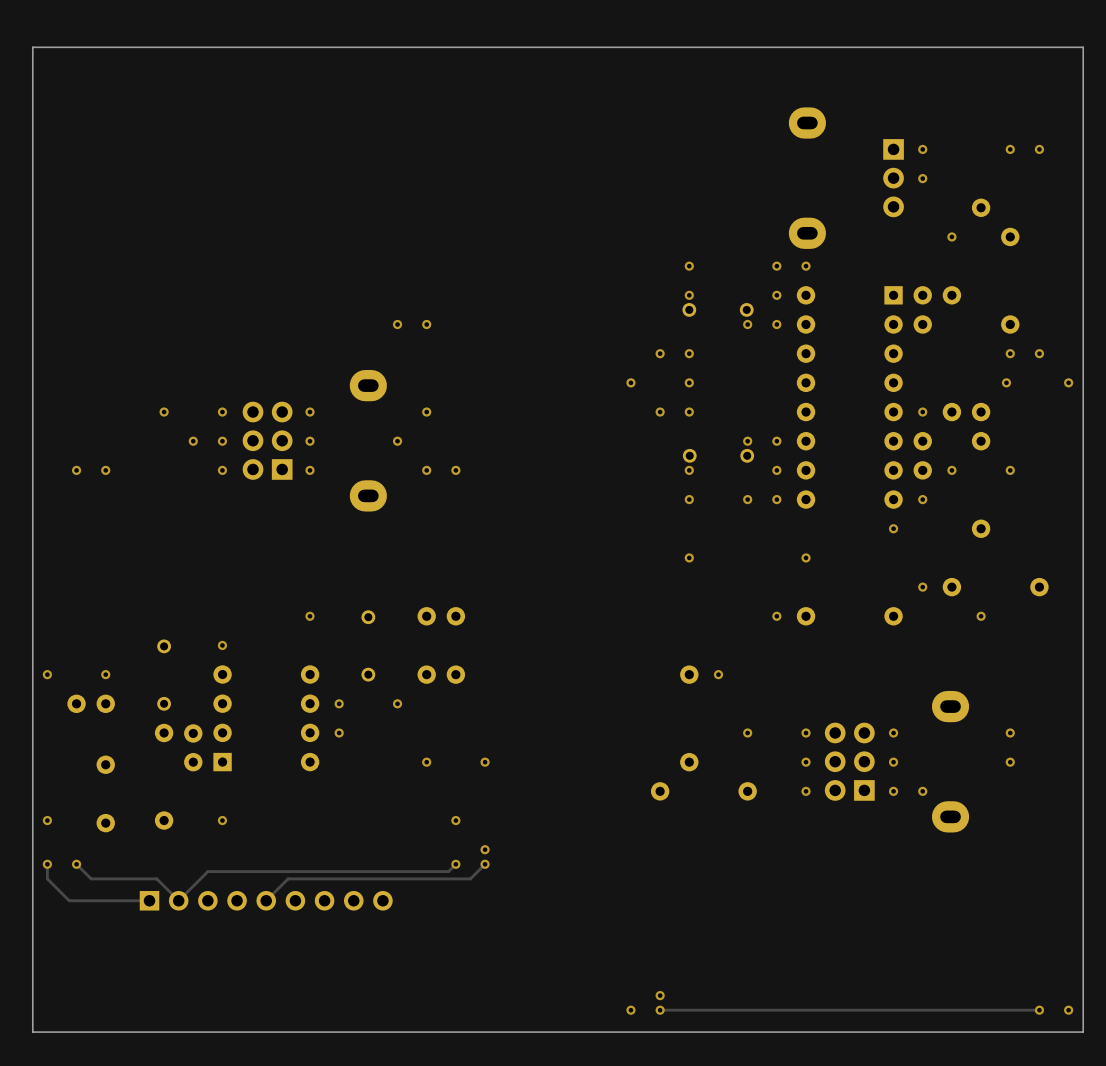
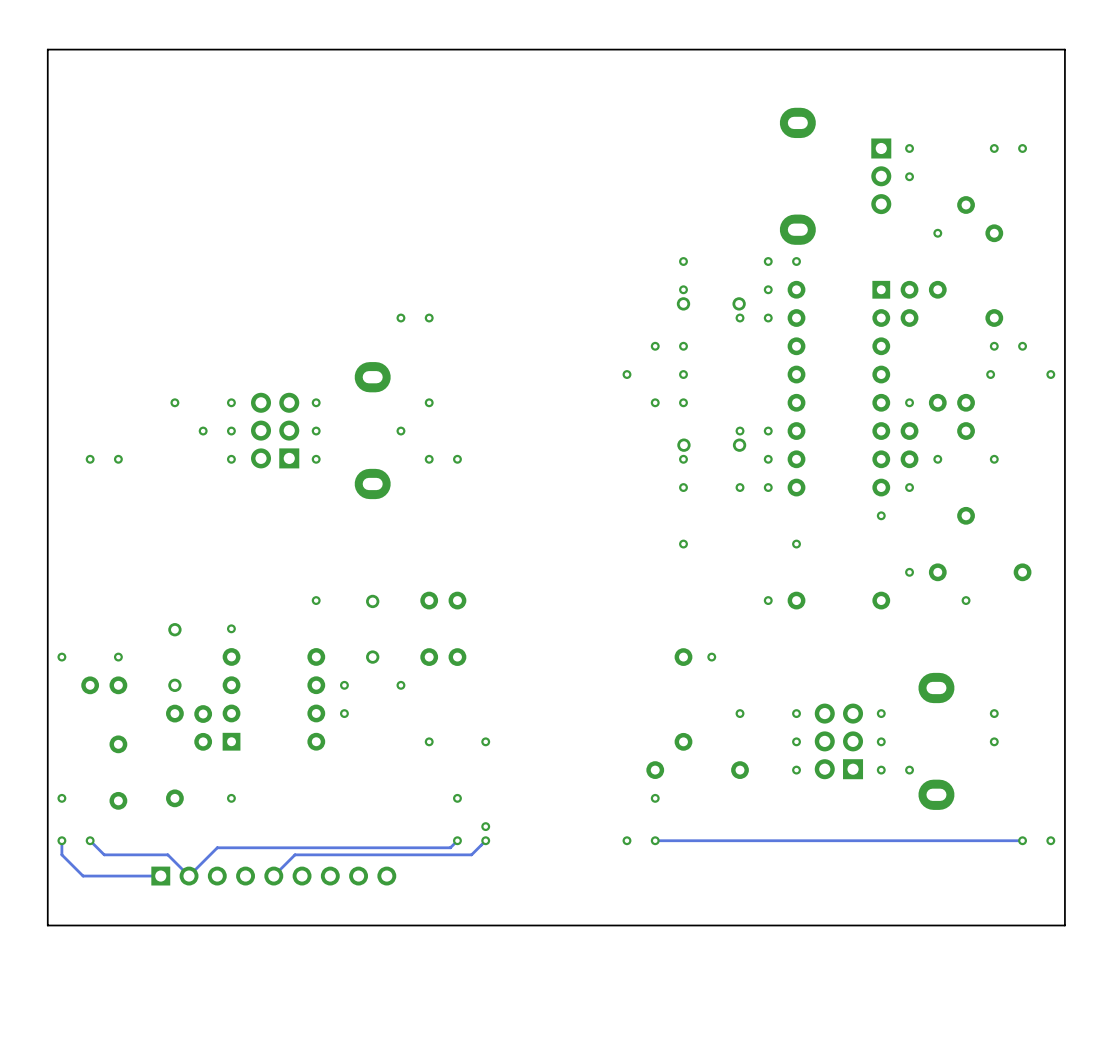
via: none -> (655, 798)
via: none -> (626, 840)
via: none -> (655, 840)
via: none -> (1022, 840)
via: none -> (1050, 840)
board edge: (1083, 951) (1083, 1032) (32, 1032) (32, 951) -> (1064, 925) (47, 925)
via: (660, 995) -> none
via: (630, 1010) -> none
via: (660, 1010) -> none
track: (1039, 1010) (660, 1010) -> (1022, 840) (655, 840)
via: (1039, 1010) -> none
via: (1068, 1010) -> none

